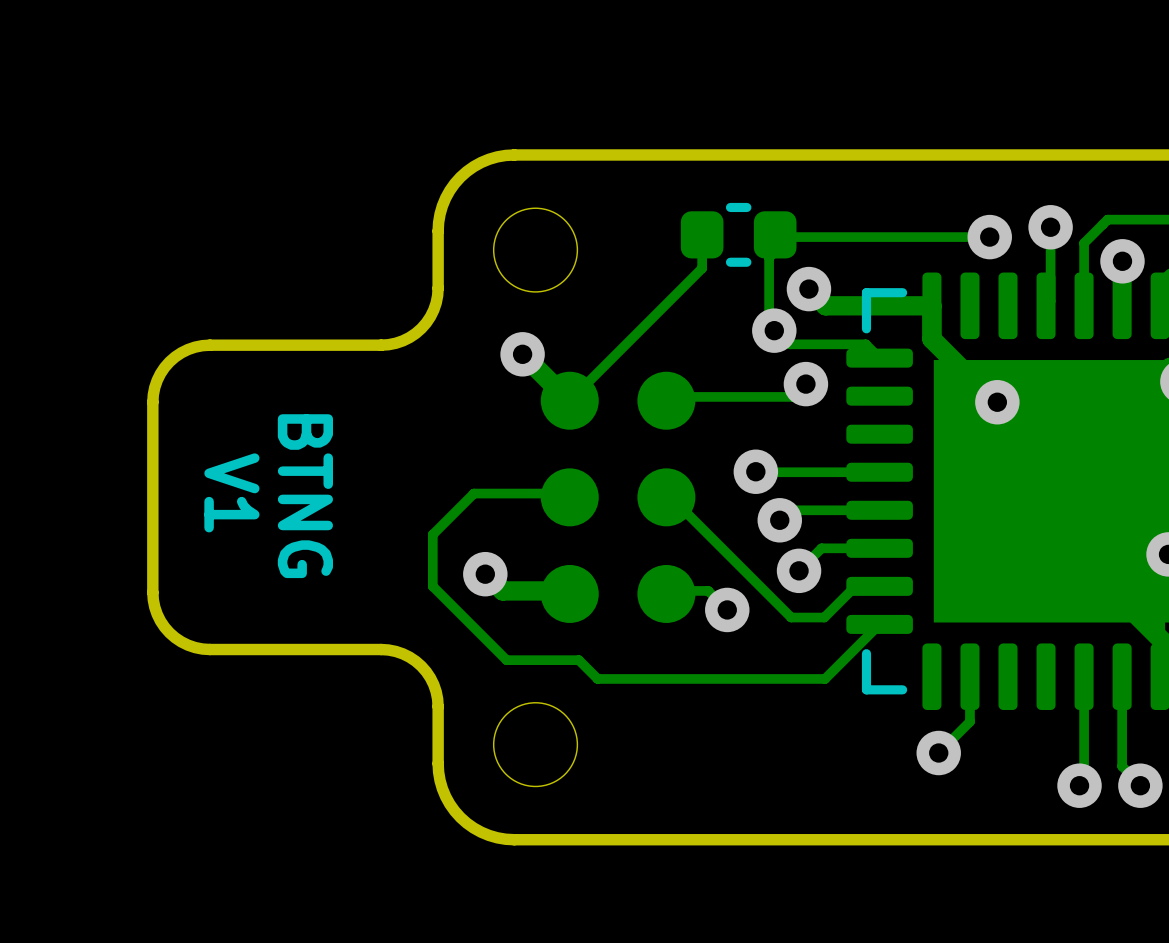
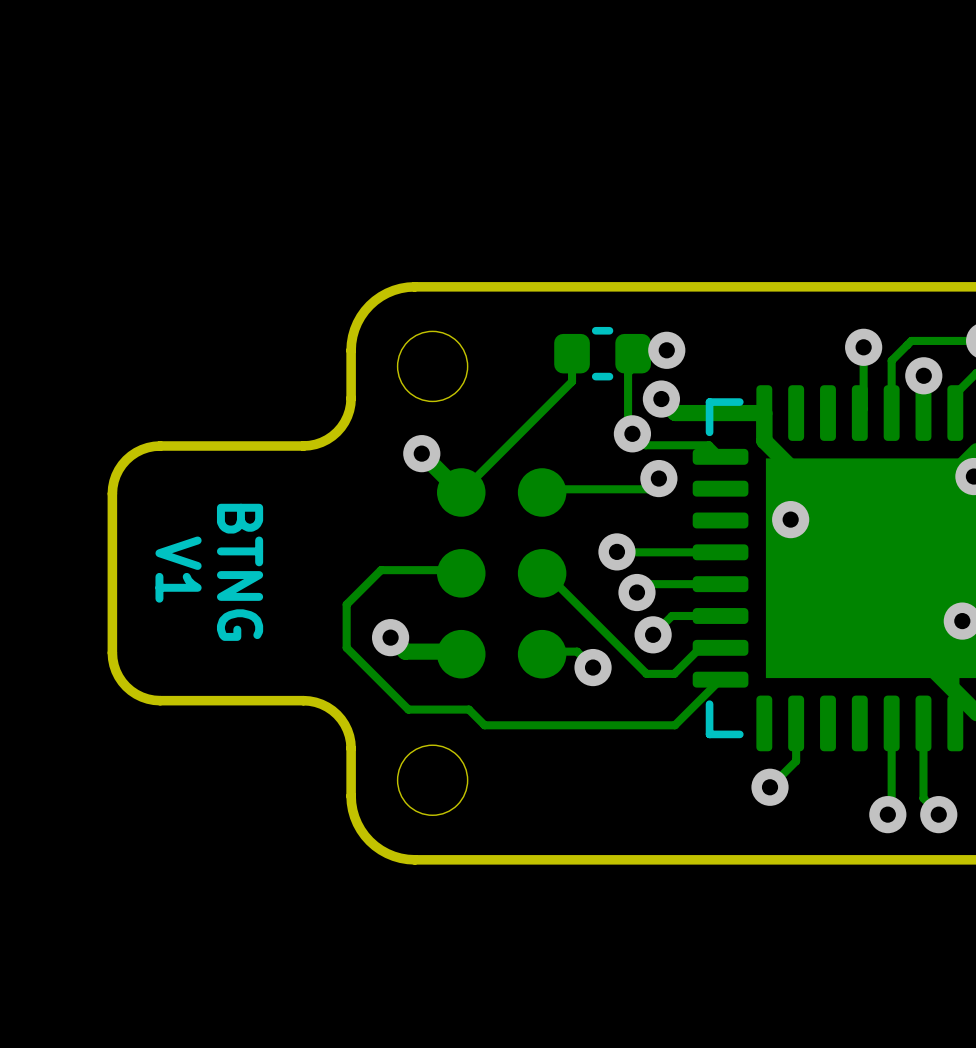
via: none -> (666, 350)
track: (989, 237) (789, 237) -> none
via: (989, 237) -> none
via position: (997, 402) -> (790, 519)

